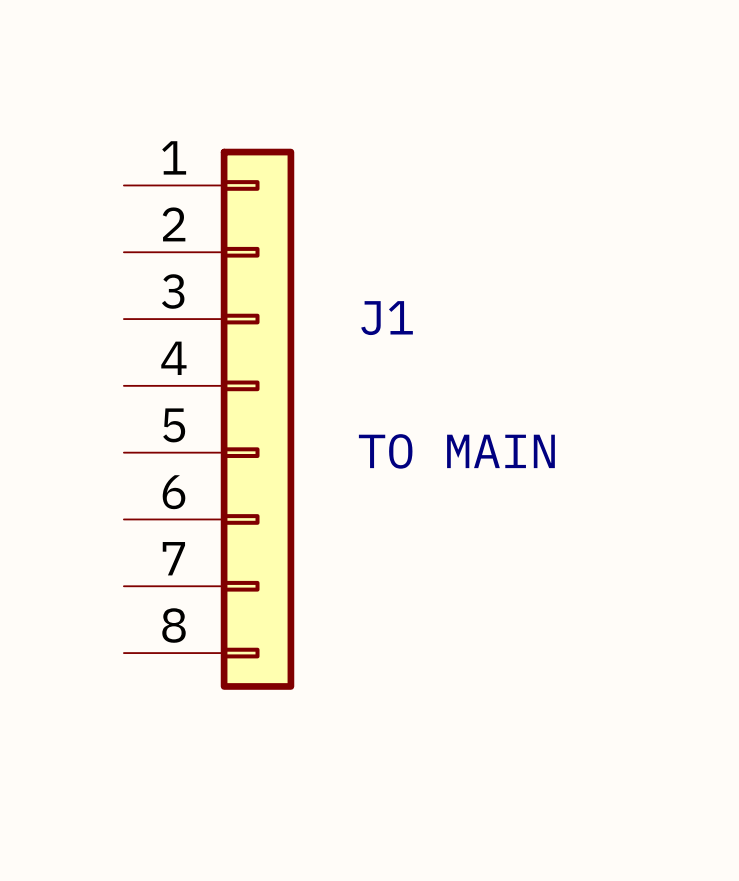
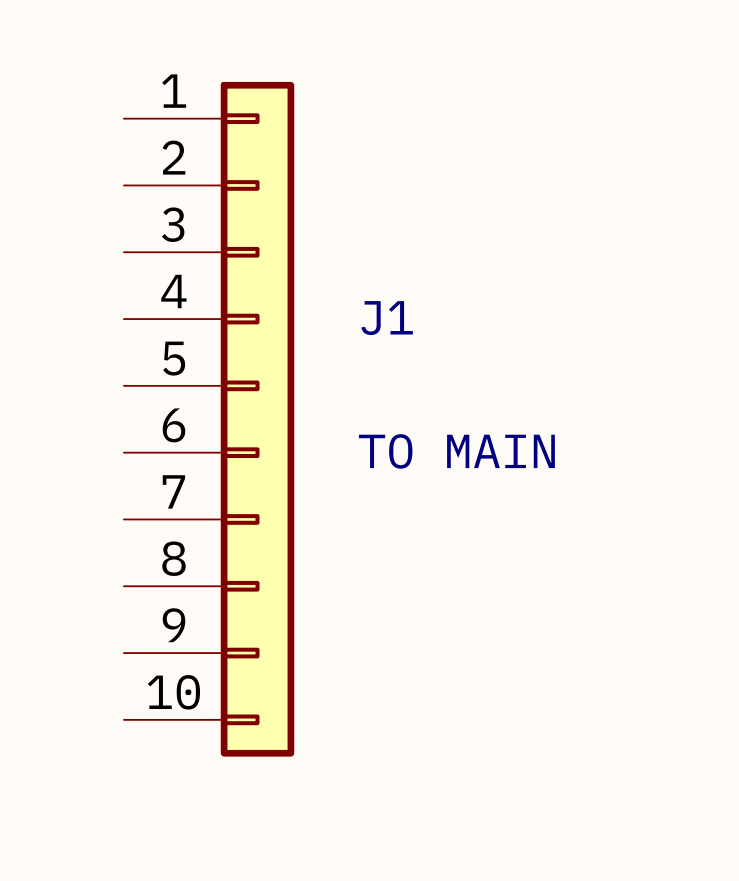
J1 symbol: [123, 148, 295, 690] -> [123, 81, 295, 757]

